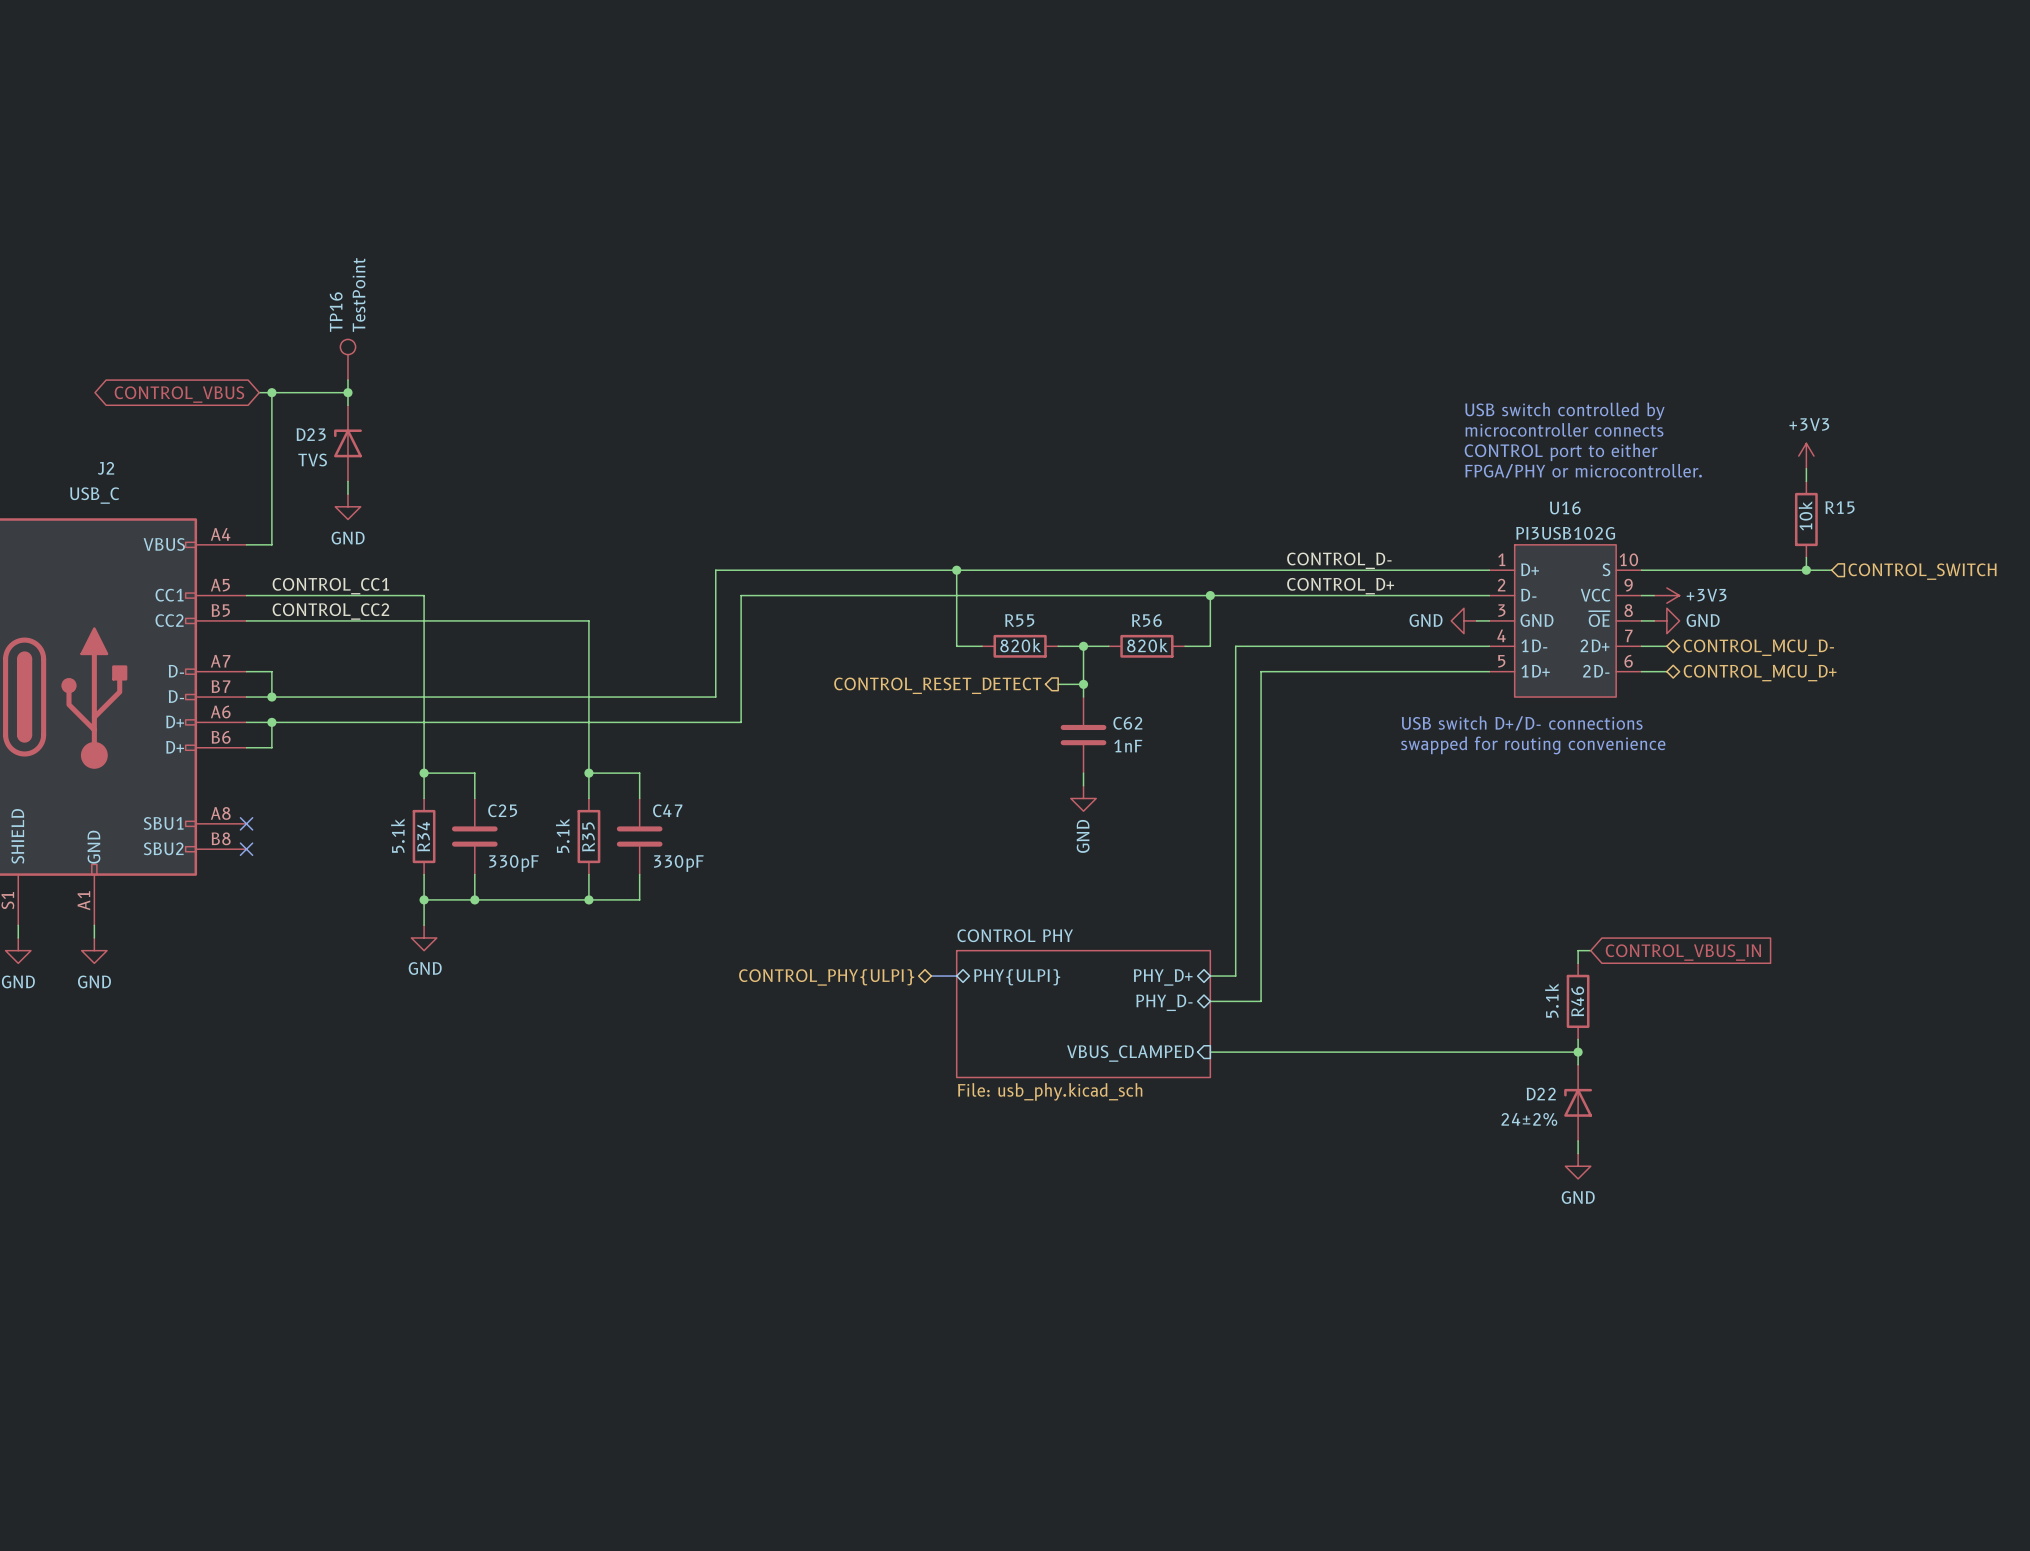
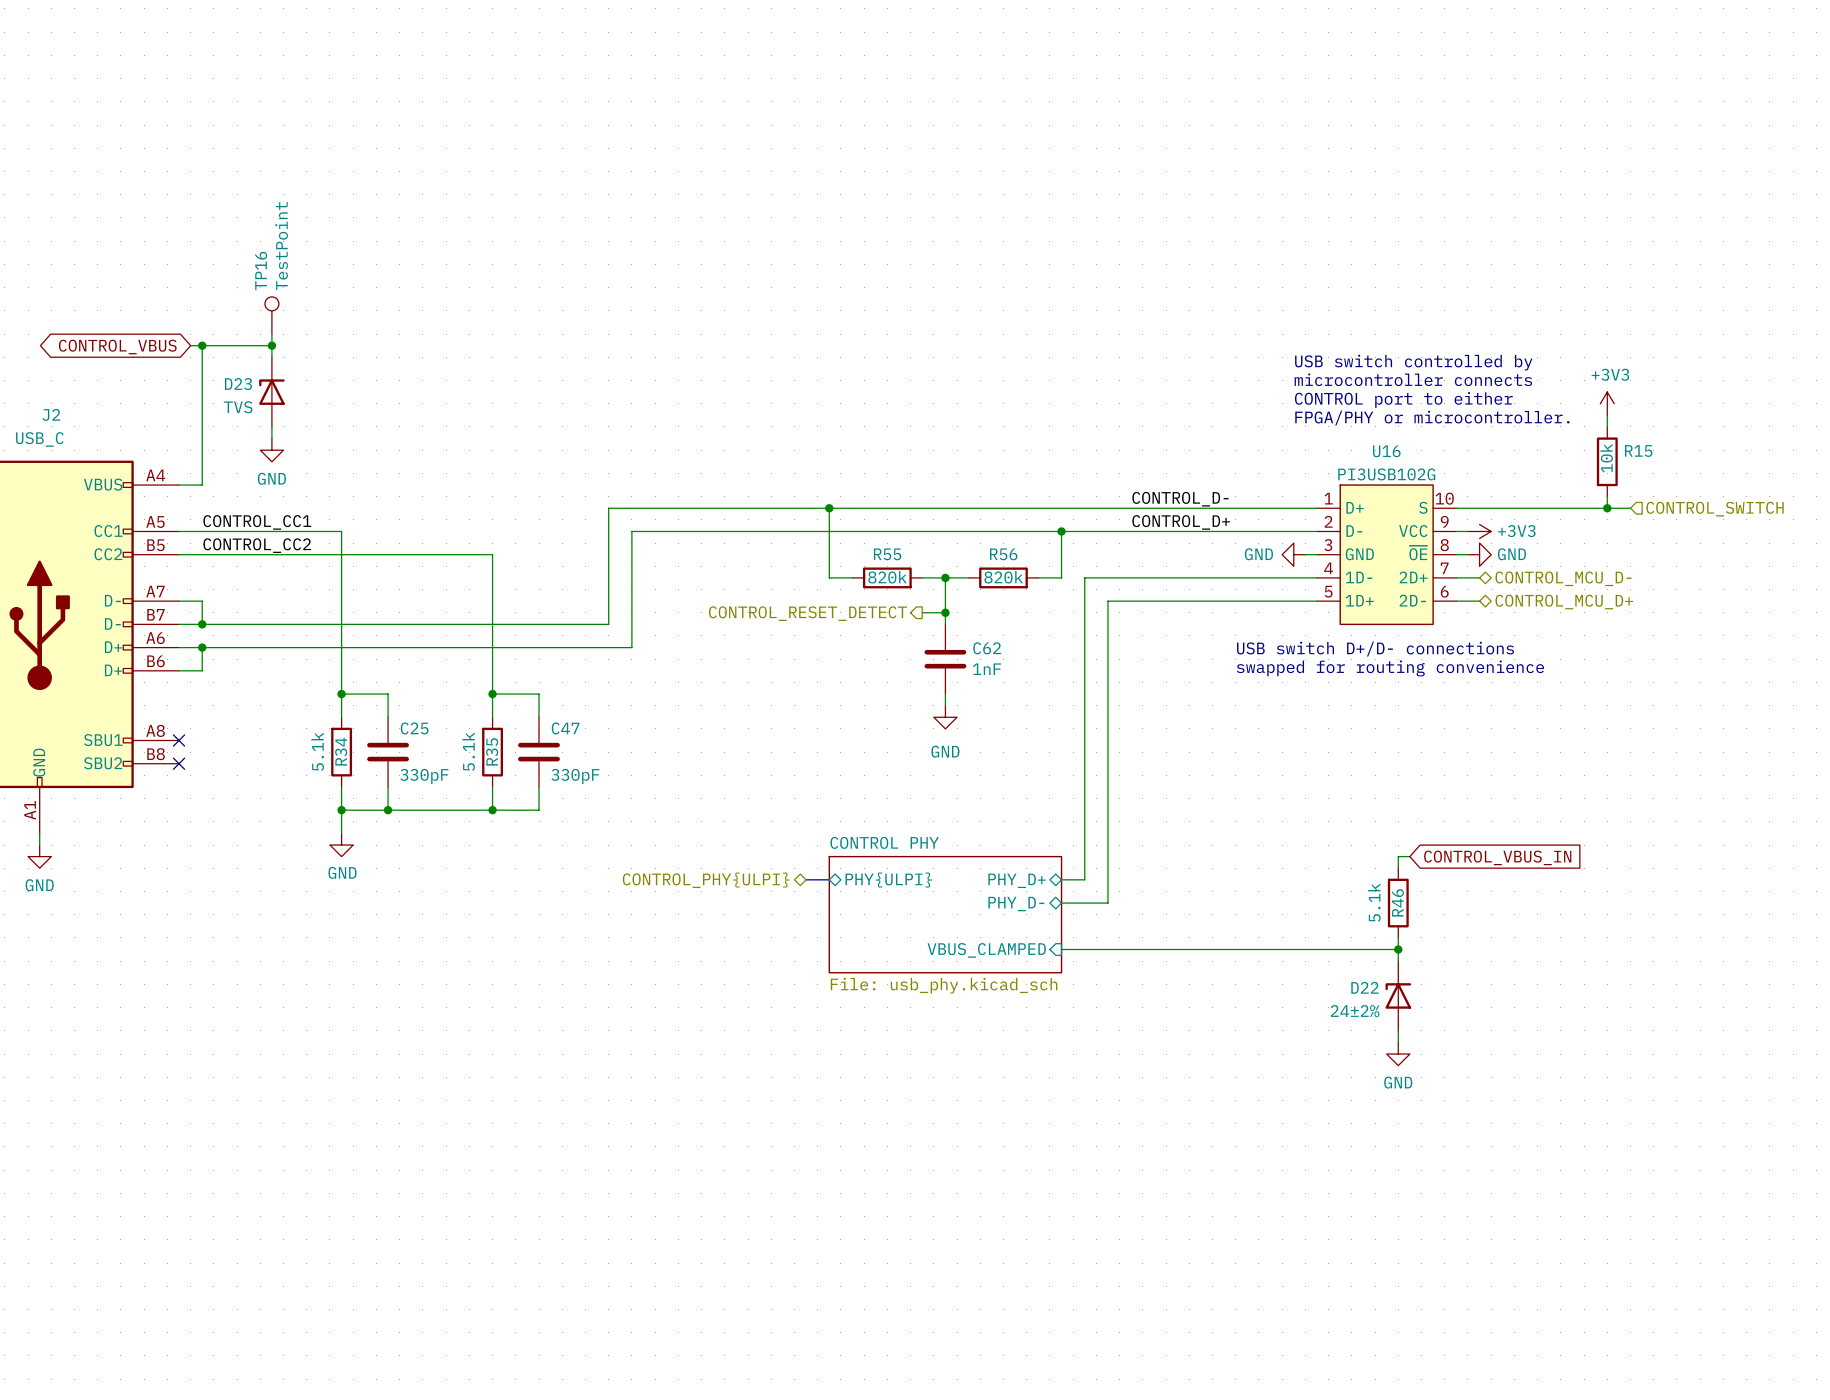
power symbol text rotation: 0° (1083, 836) -> 90° clockwise (945, 751)

